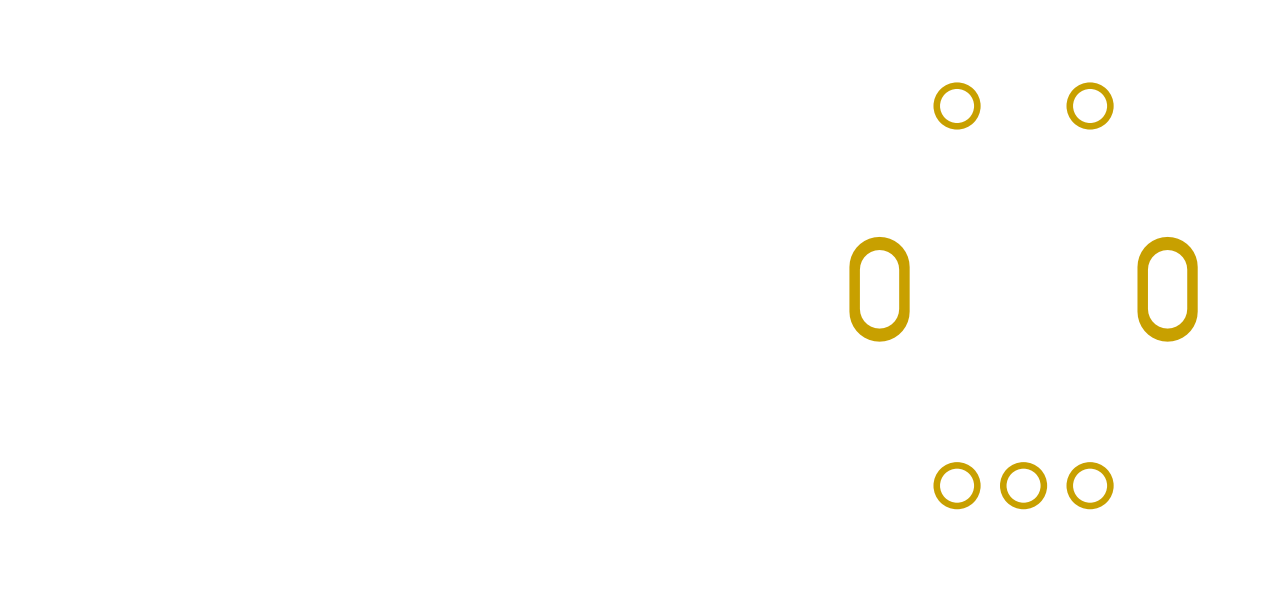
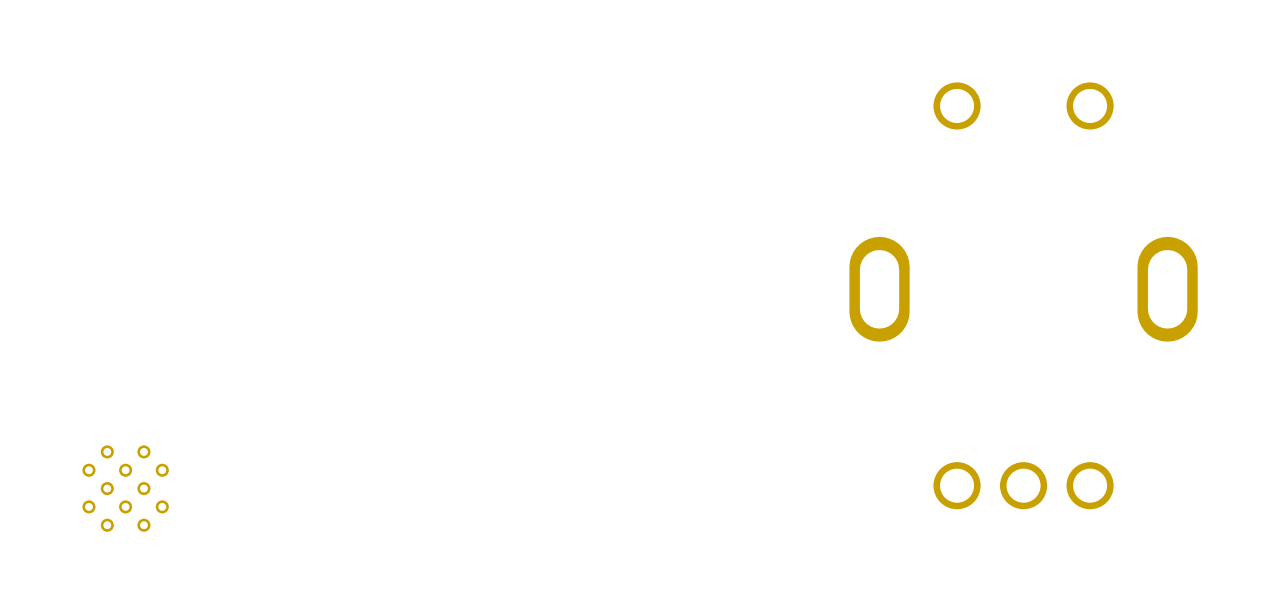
part: none -> (125, 488)

